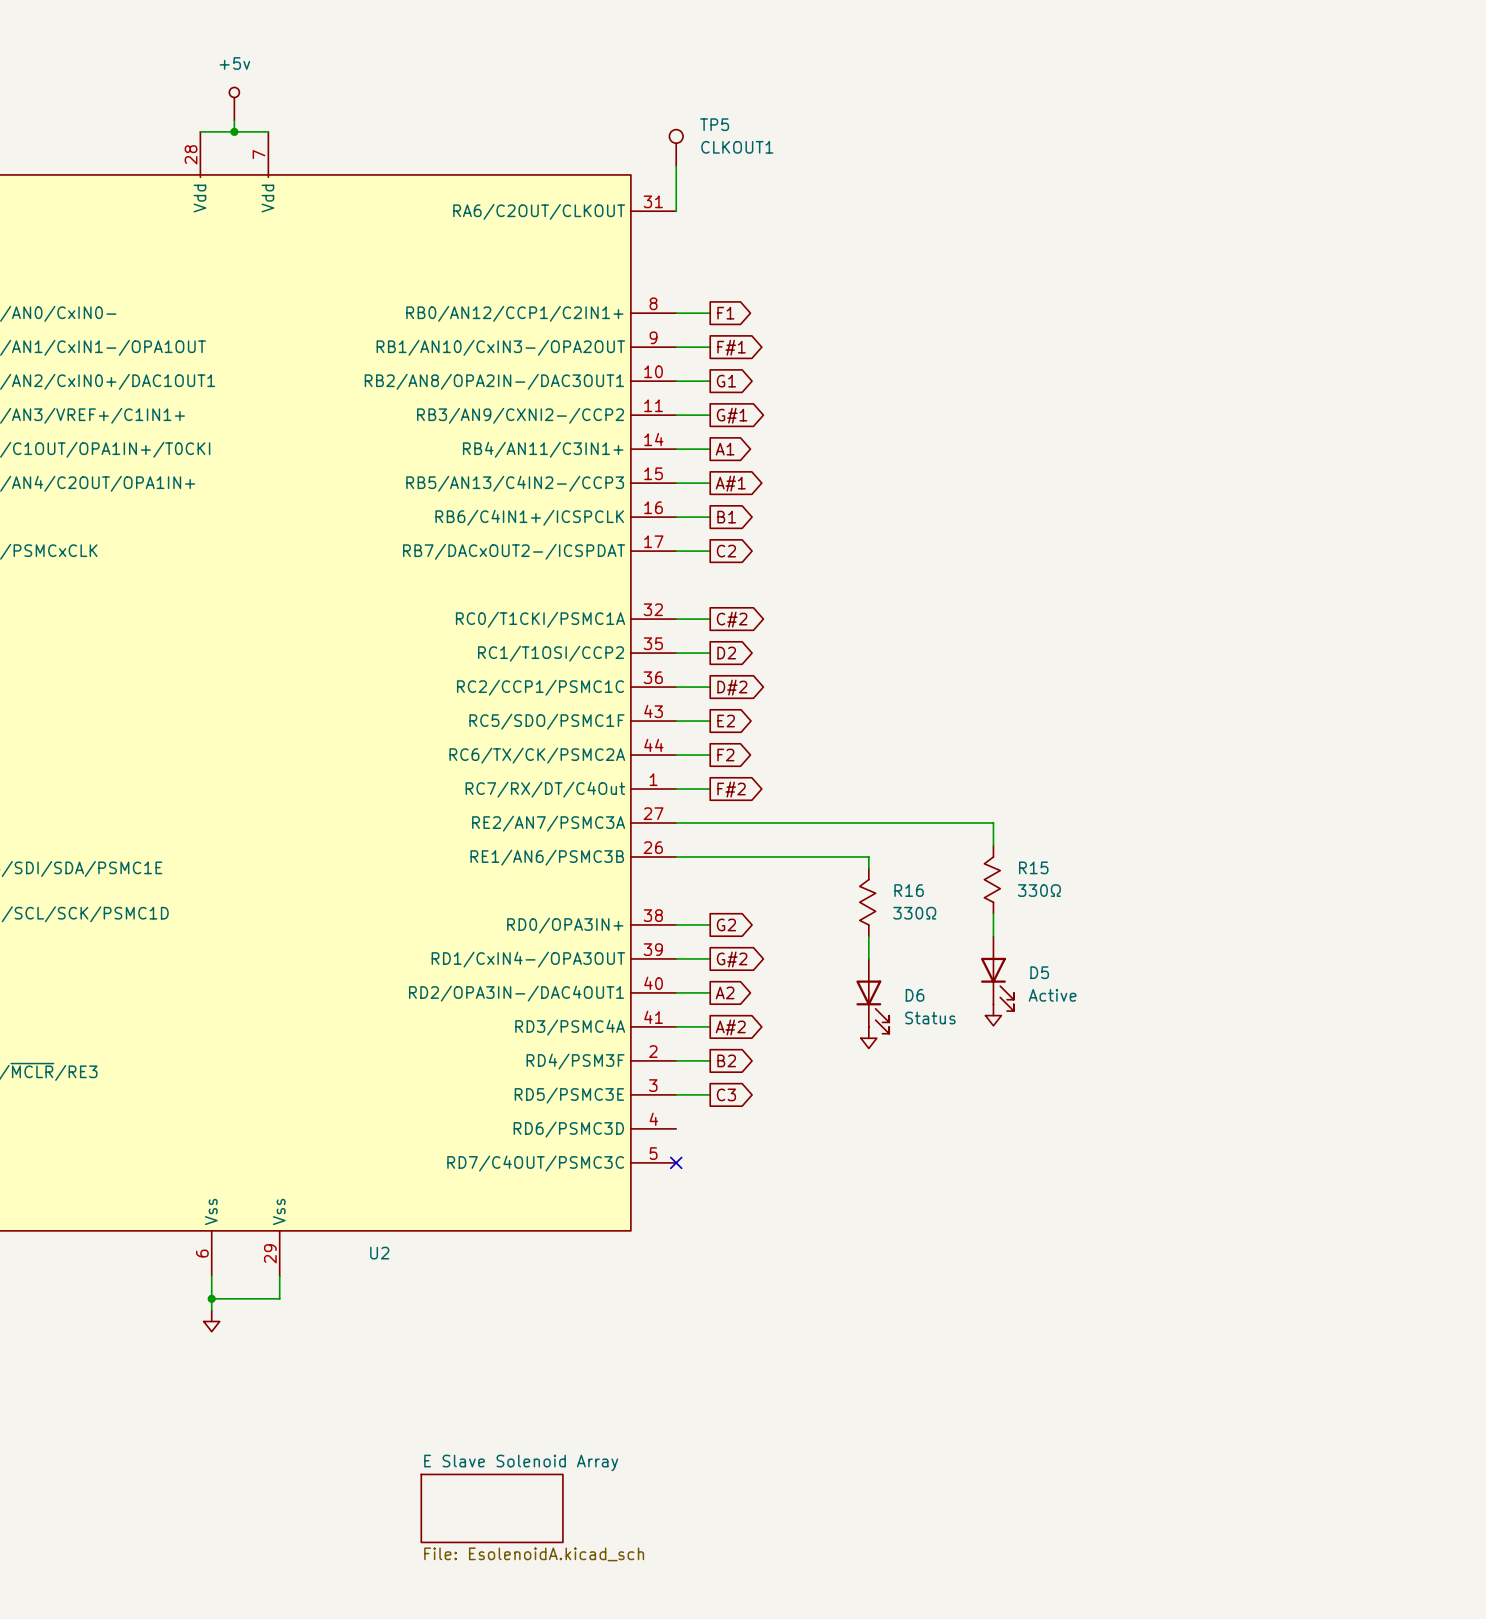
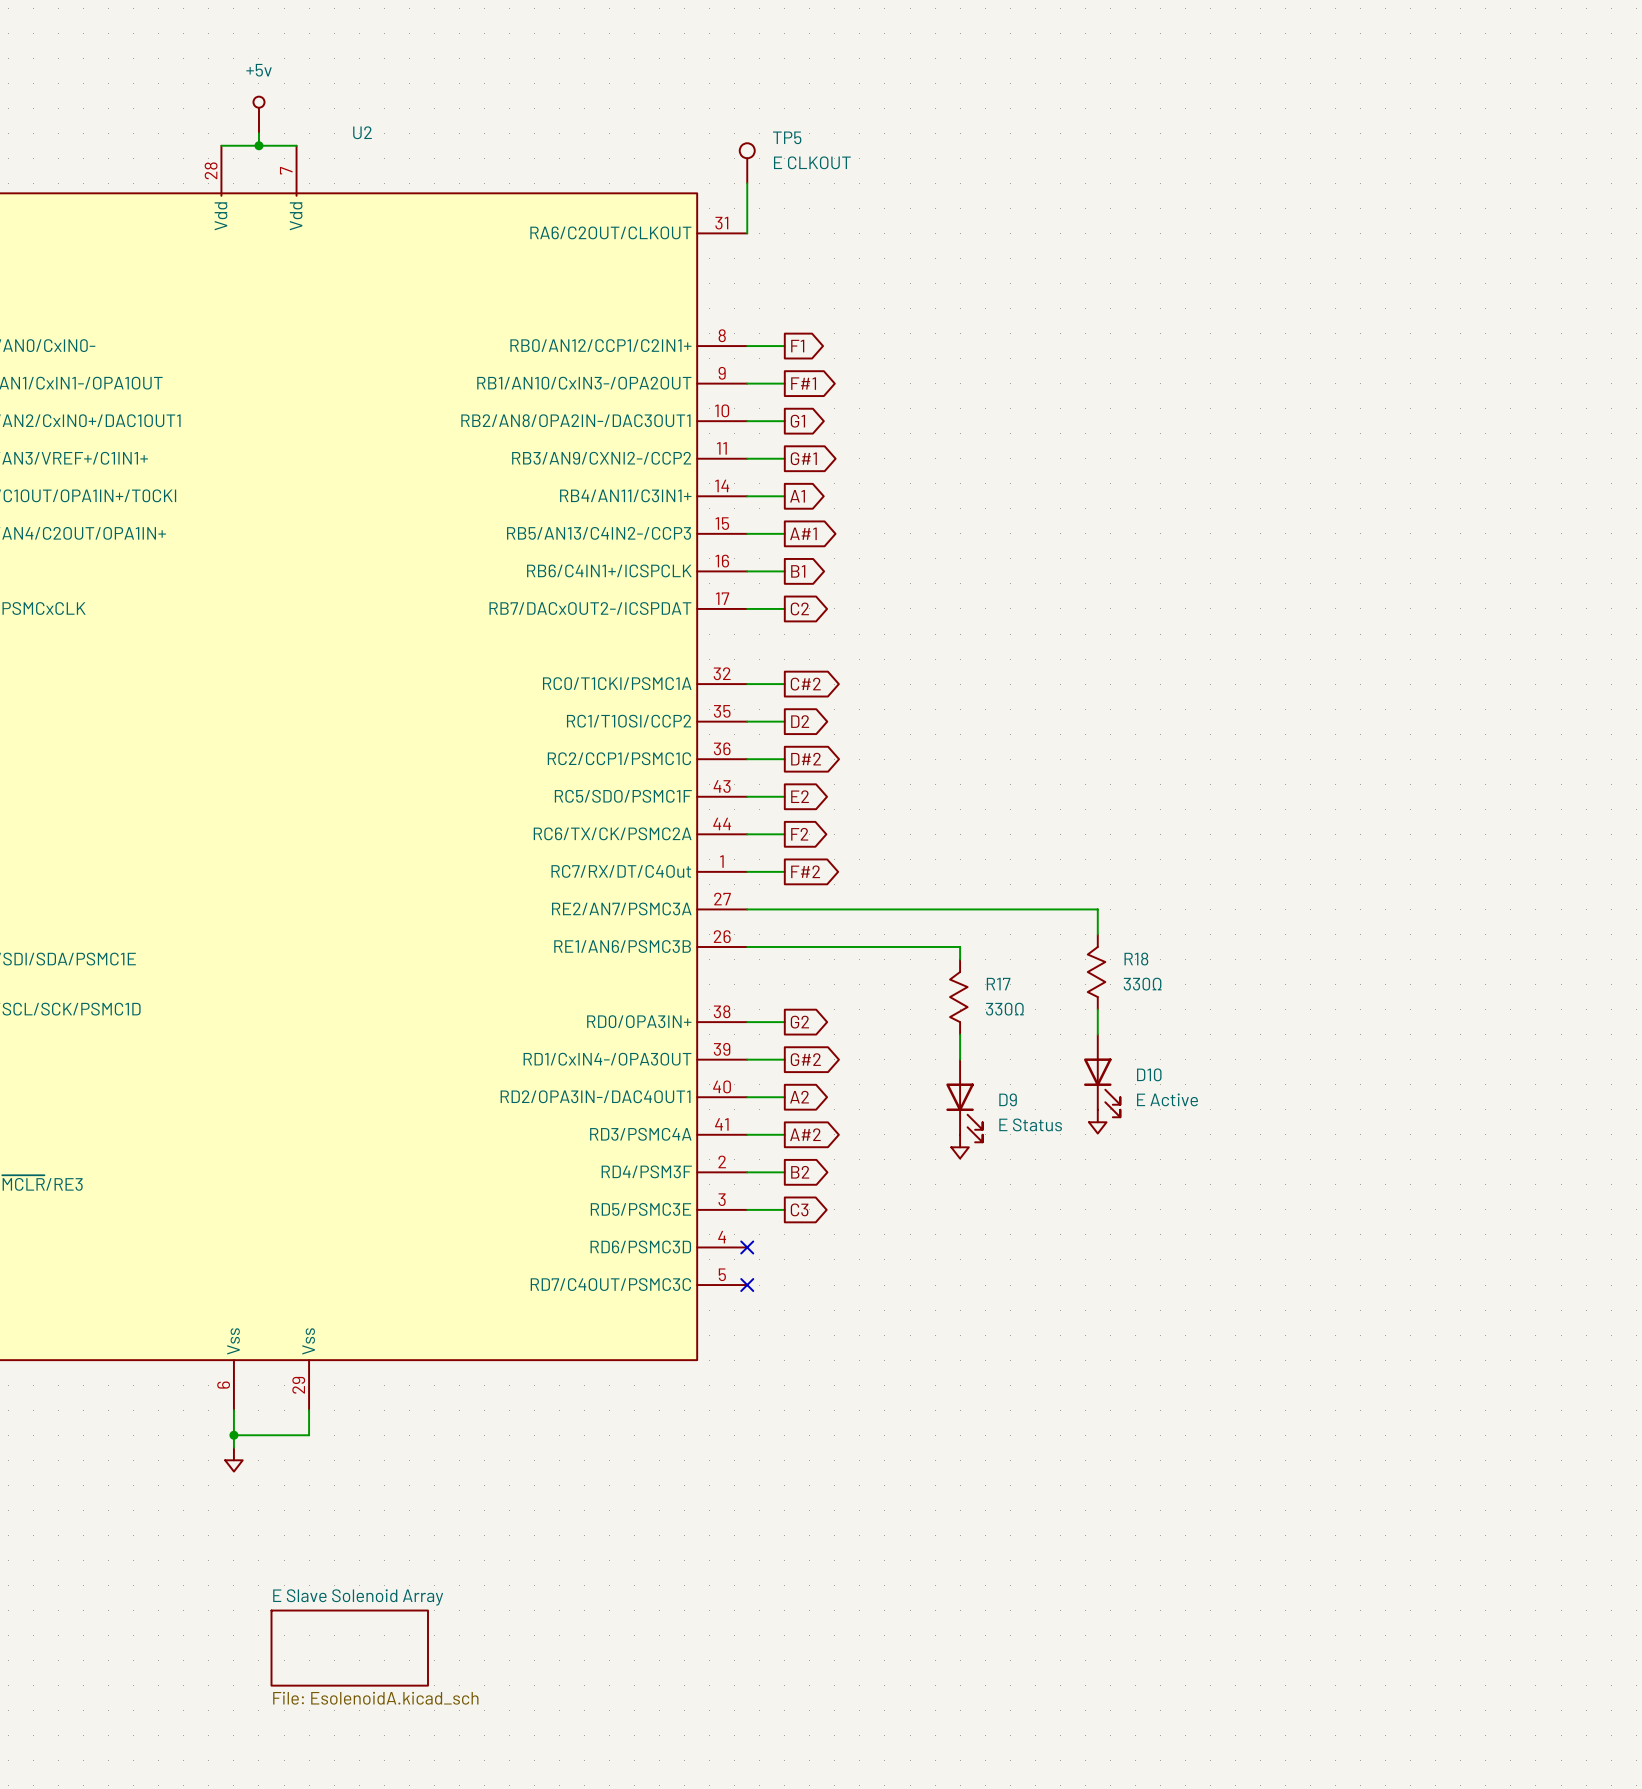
TP5 value: CLKOUT1 (737, 147) -> E CLKOUT (812, 162)
R15 name: R15 (1033, 867) -> R18 (1136, 959)
R16 name: R16 (909, 890) -> R17 (998, 984)
D5 name: D5 (1039, 972) -> D10 (1149, 1074)
D6 name: D6 (915, 995) -> D9 (1008, 1099)
D5 value: Active (1052, 995) -> E Active (1167, 1099)
D6 value: Status (930, 1018) -> E Status (1030, 1124)
no-connect mark: none -> (747, 1247)
U2 name position: U2 (379, 1253) -> U2 (362, 132)
sheet E Slave Solenoid Array position: (492, 1508) -> (349, 1648)

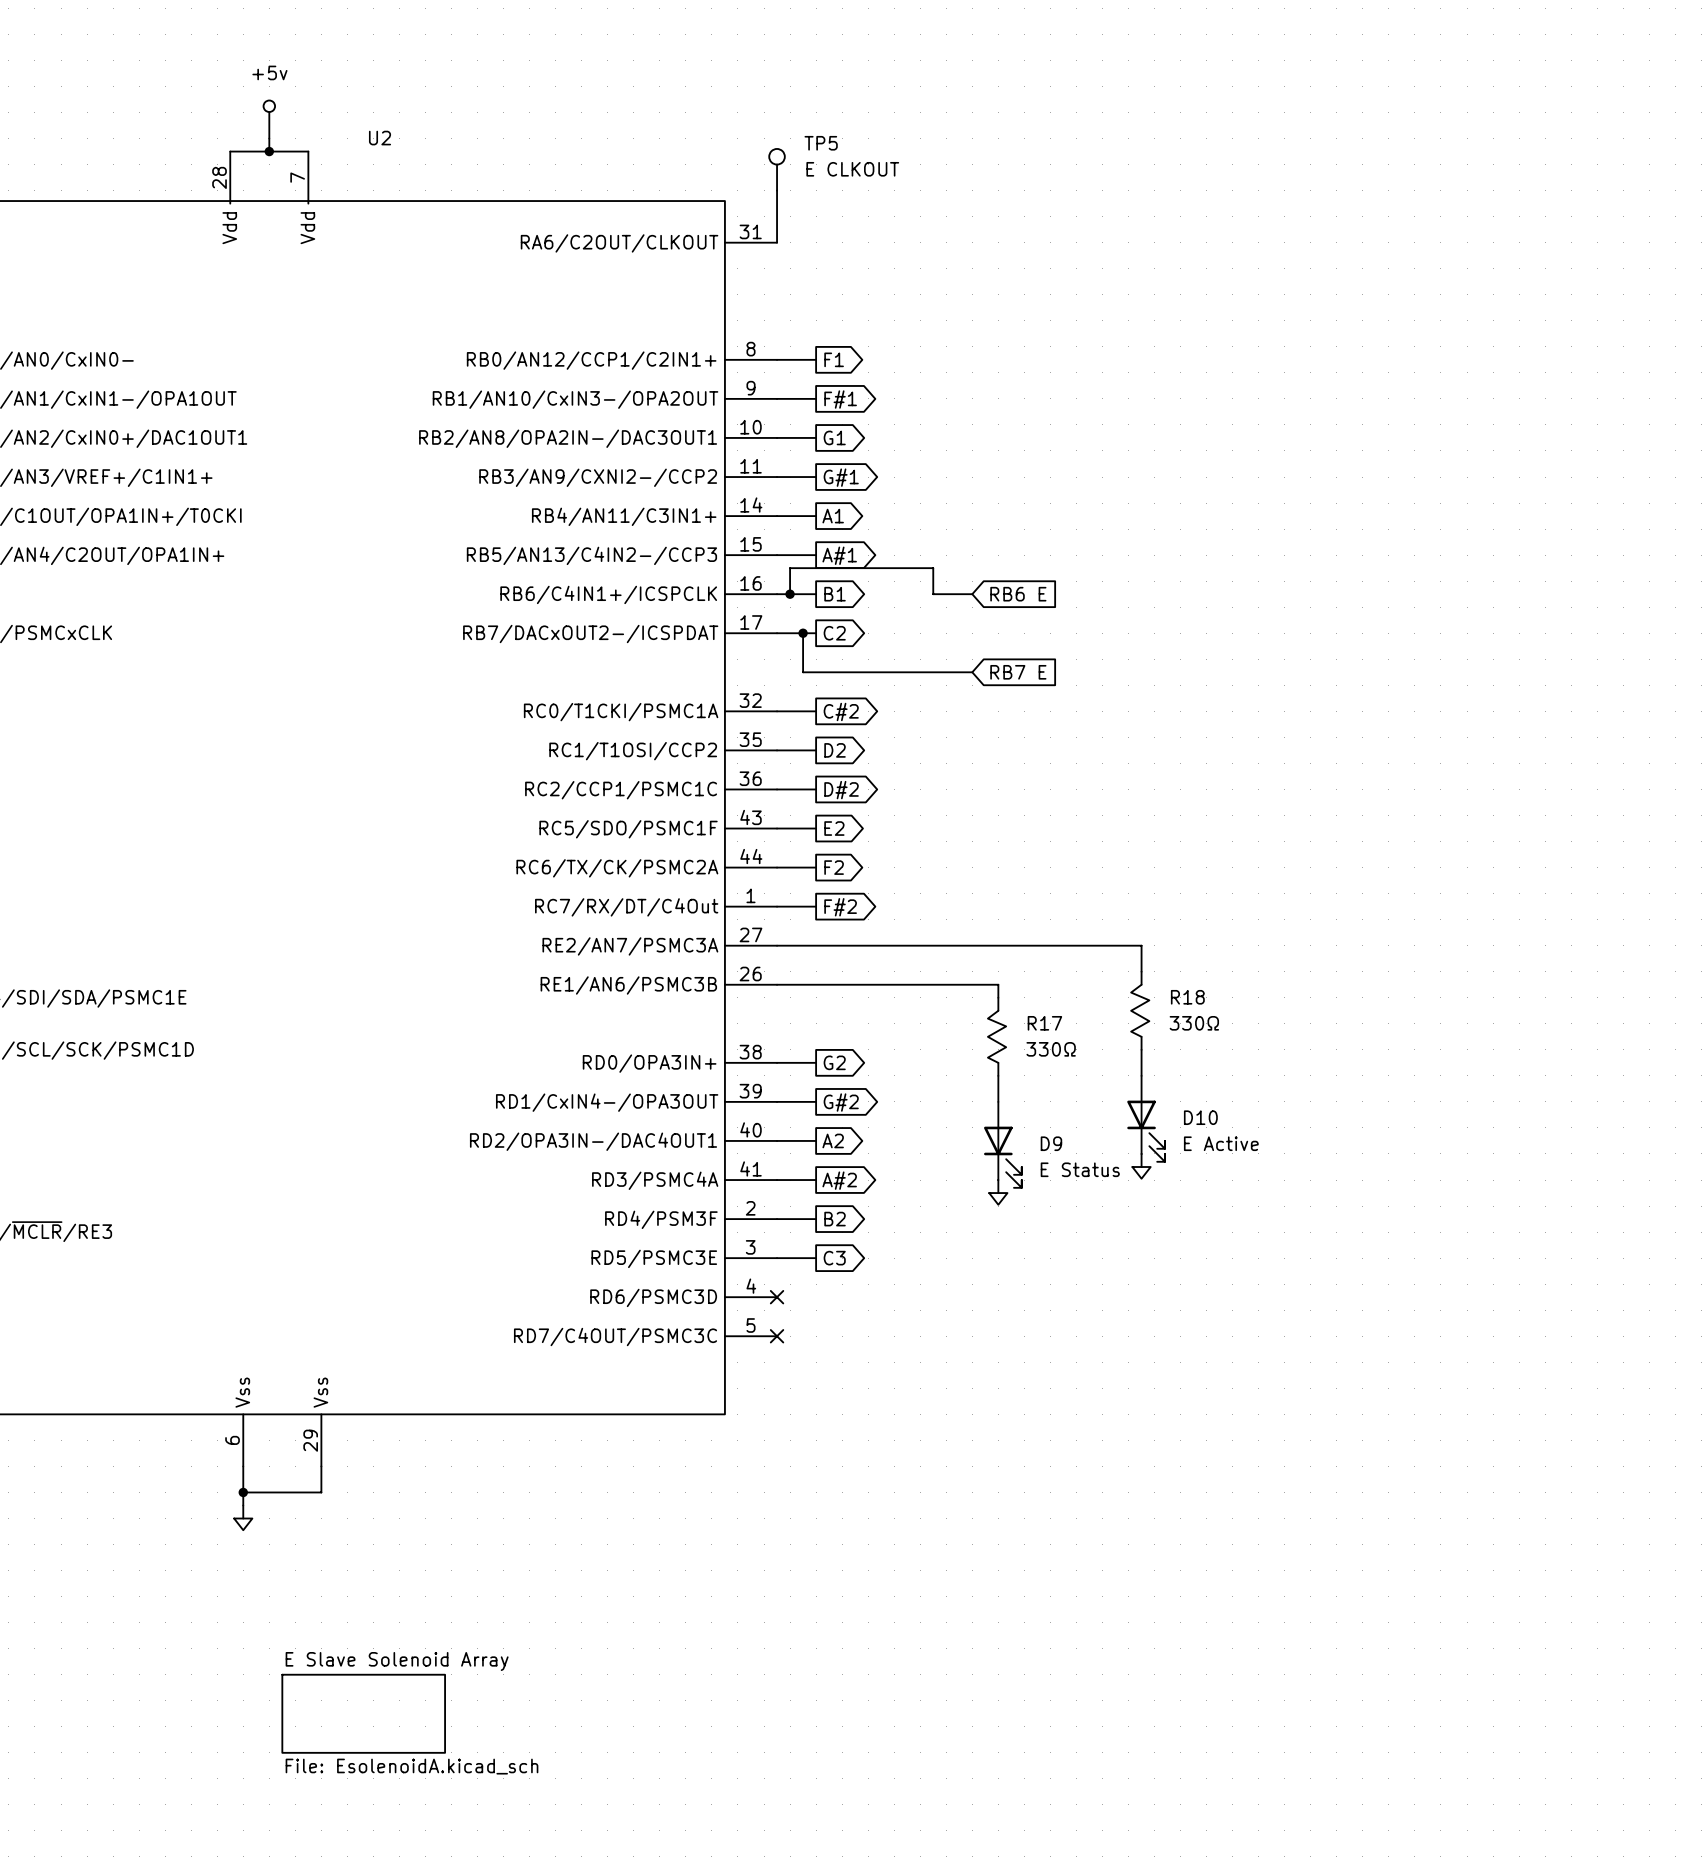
wire: none -> (790, 594) (790, 568) (933, 568) (933, 594) (972, 594)
junction: none -> (790, 594)
global label: none -> RB6 E (1018, 594)
wire: none -> (803, 633) (803, 672) (972, 672)
junction: none -> (803, 633)
global label: none -> RB7 E (1018, 672)

